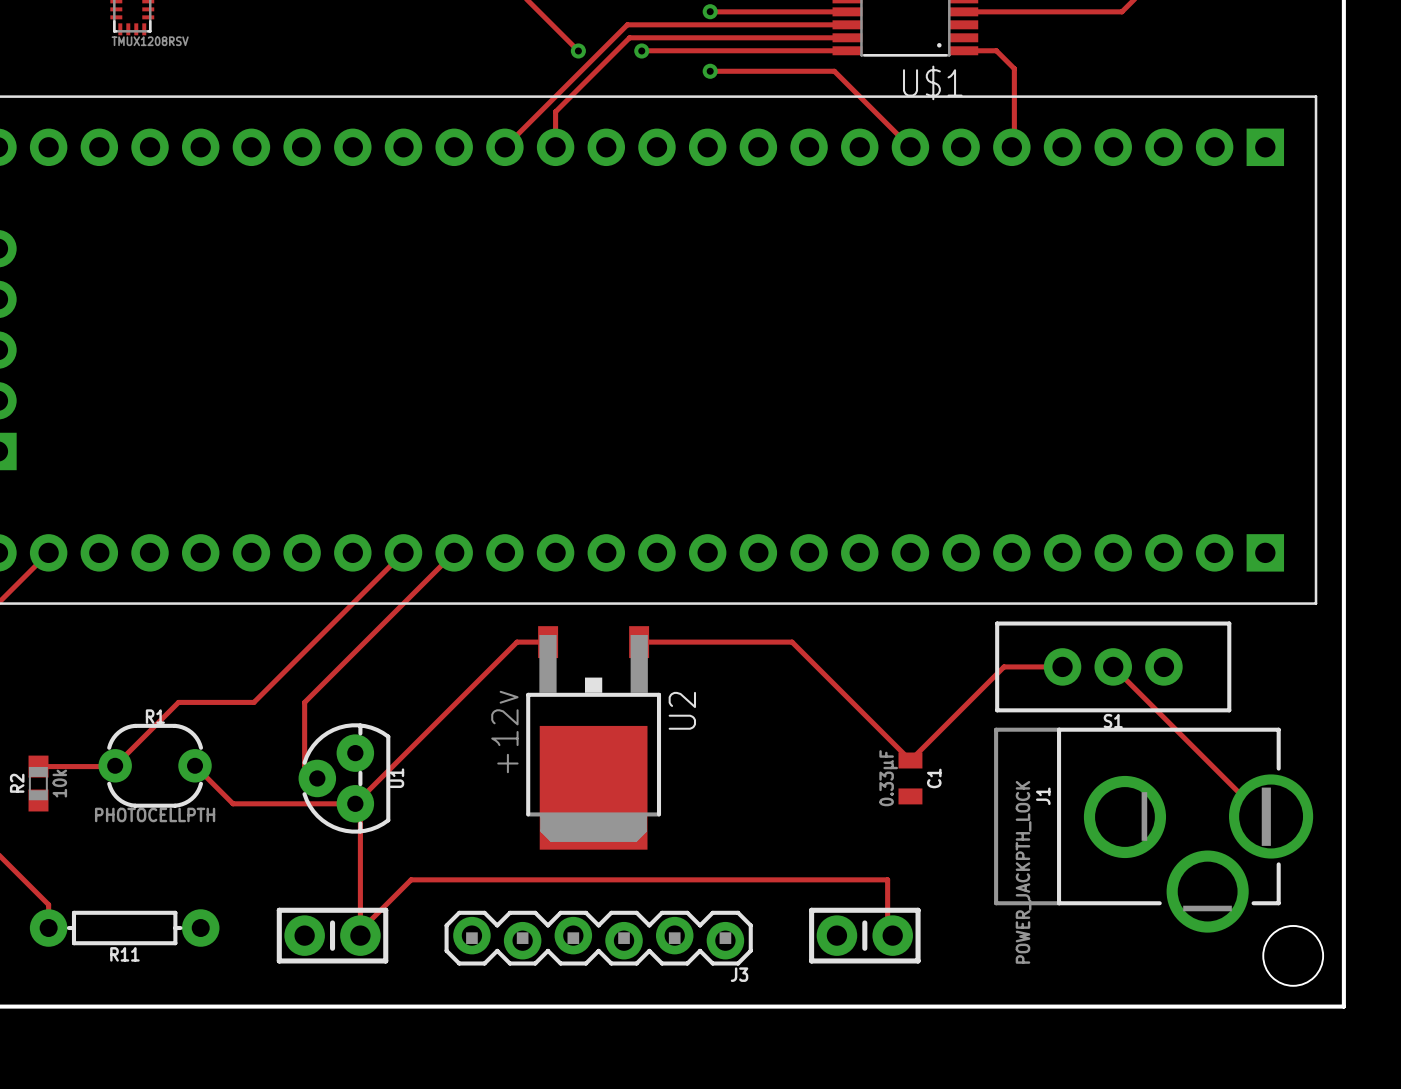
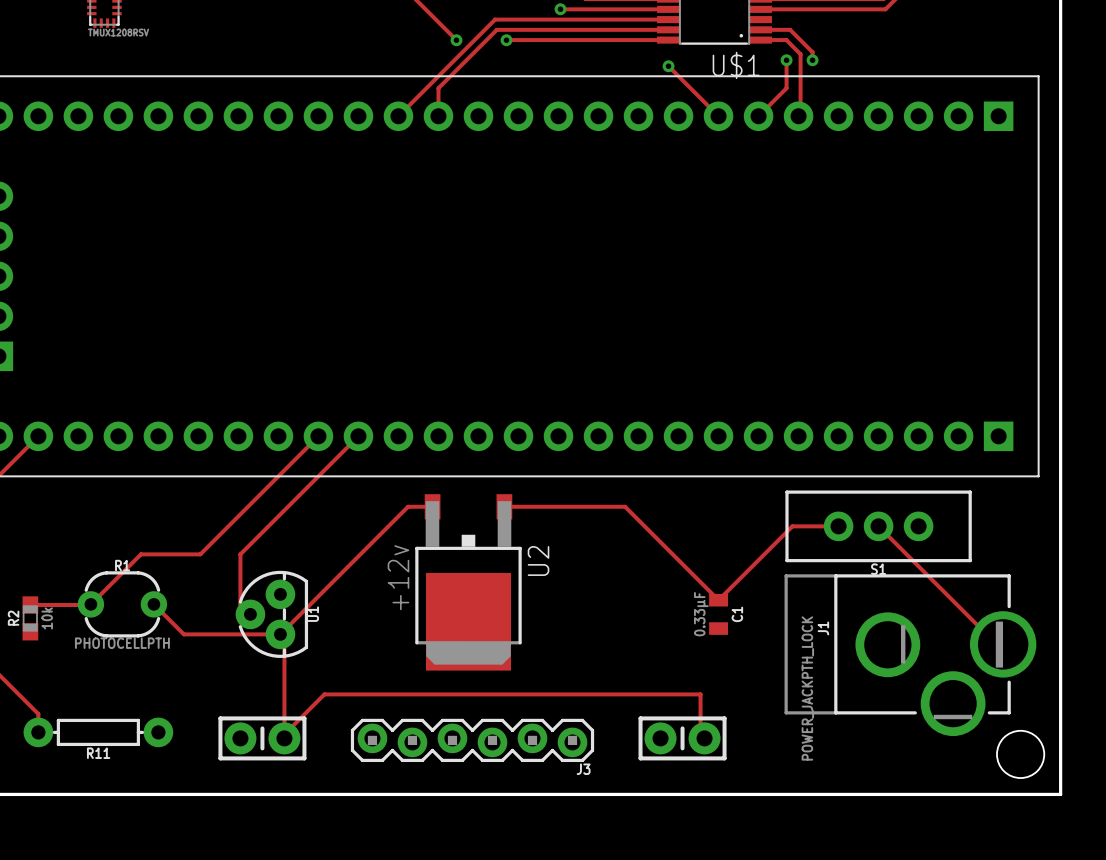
track: none -> (760, 29) (790, 29) (812, 52) (812, 60)
track: (710, 71) (834, 71) (847, 83) -> none
via: (710, 71) -> none
track: none -> (786, 60) (786, 88) (758, 116)
via: none -> (786, 60)
via: none -> (812, 60)
via: none -> (668, 66)

